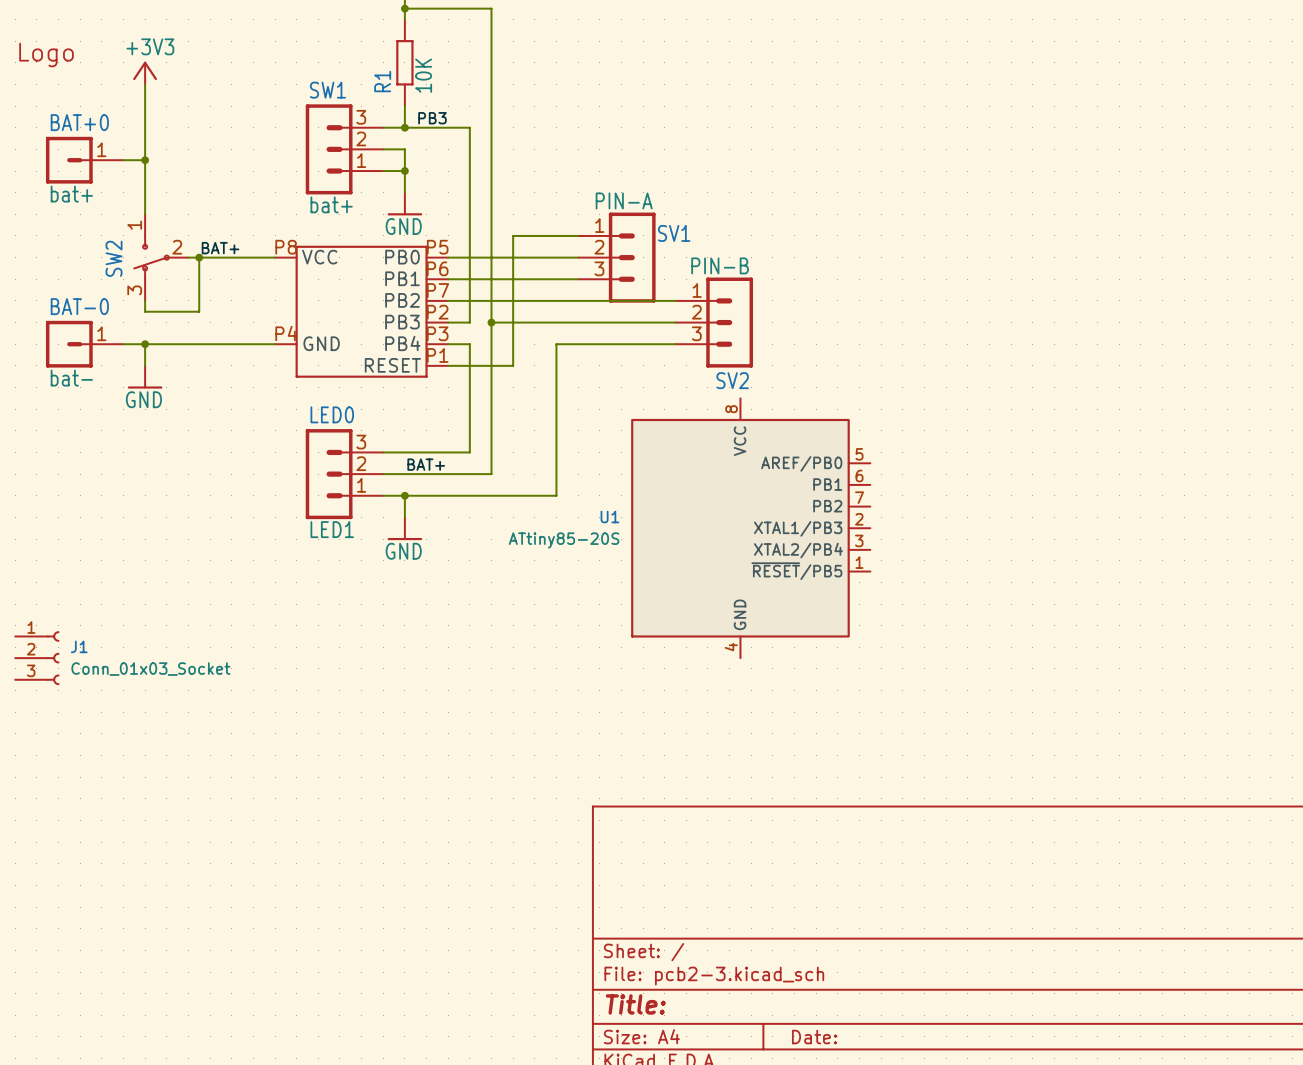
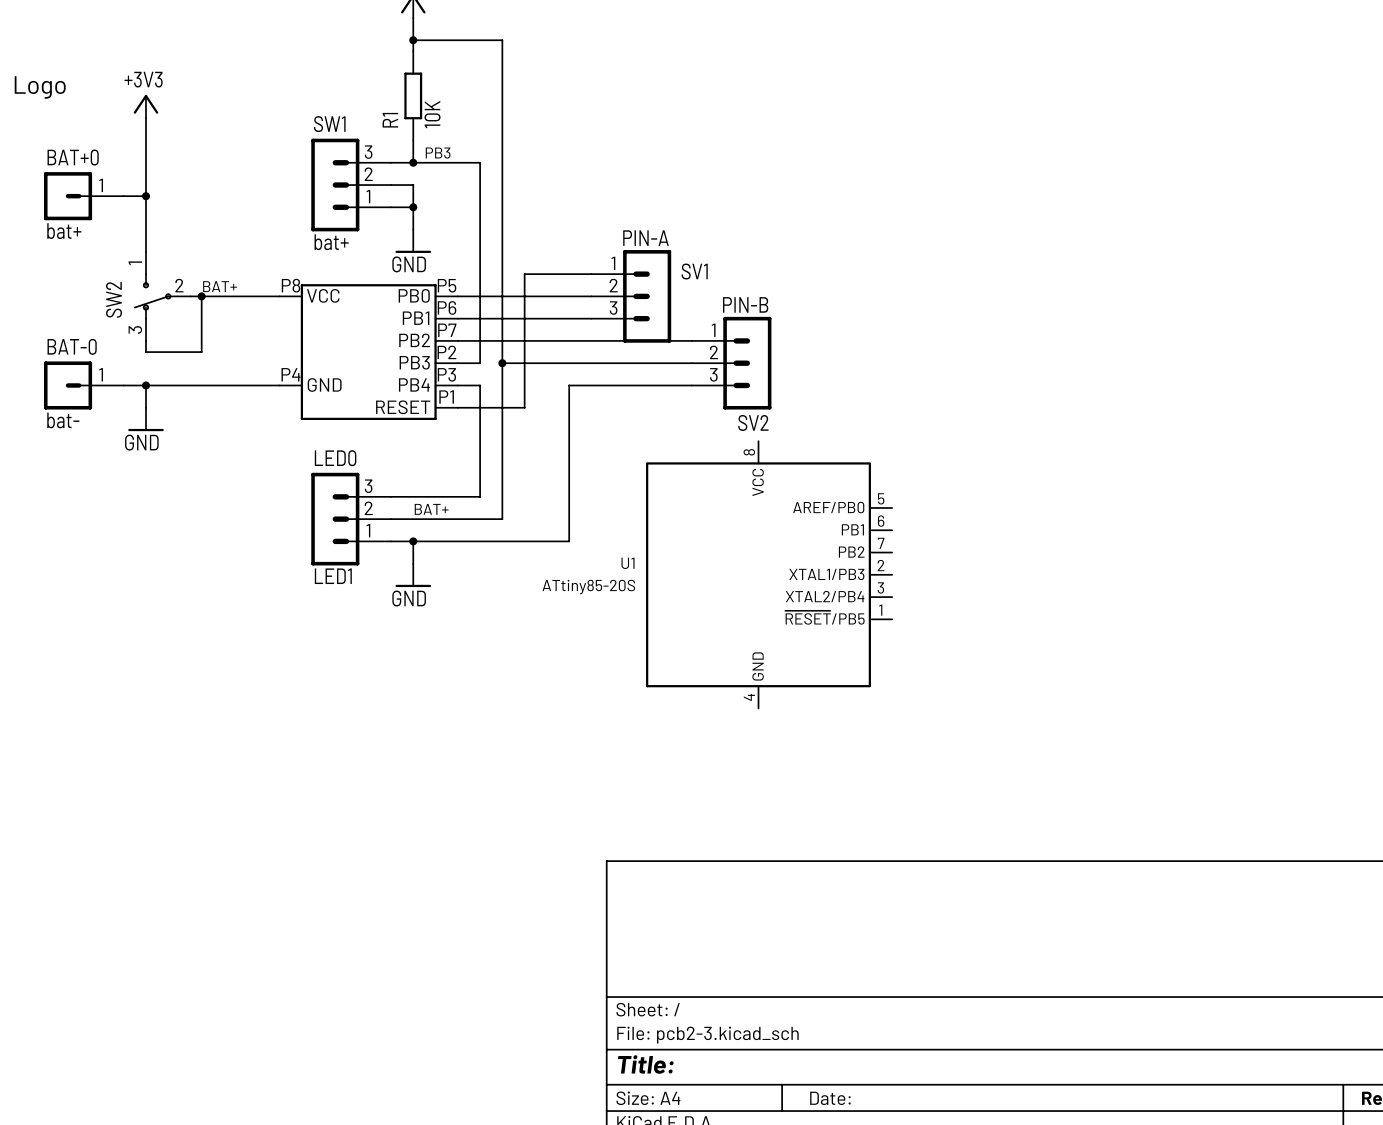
J1: Conn_01x03_Socket (37, 658) -> none

